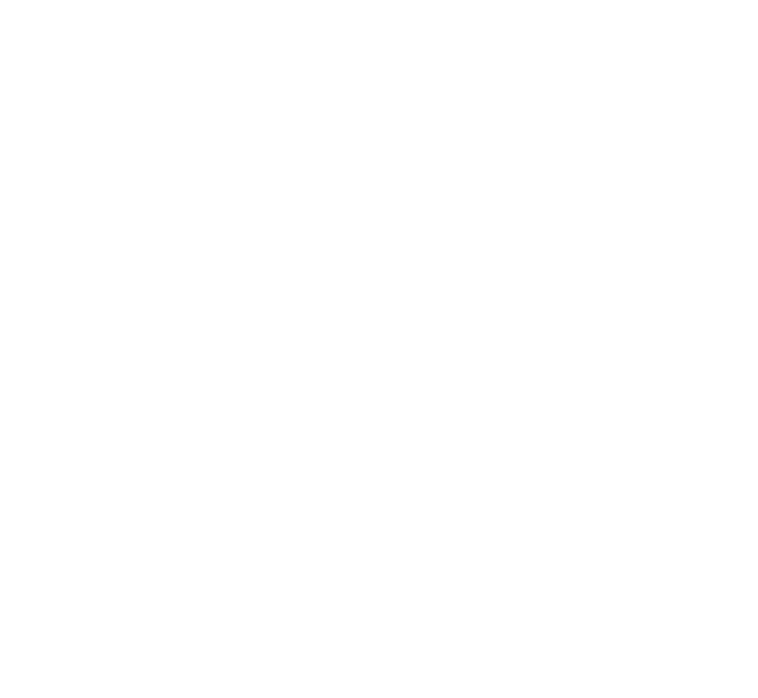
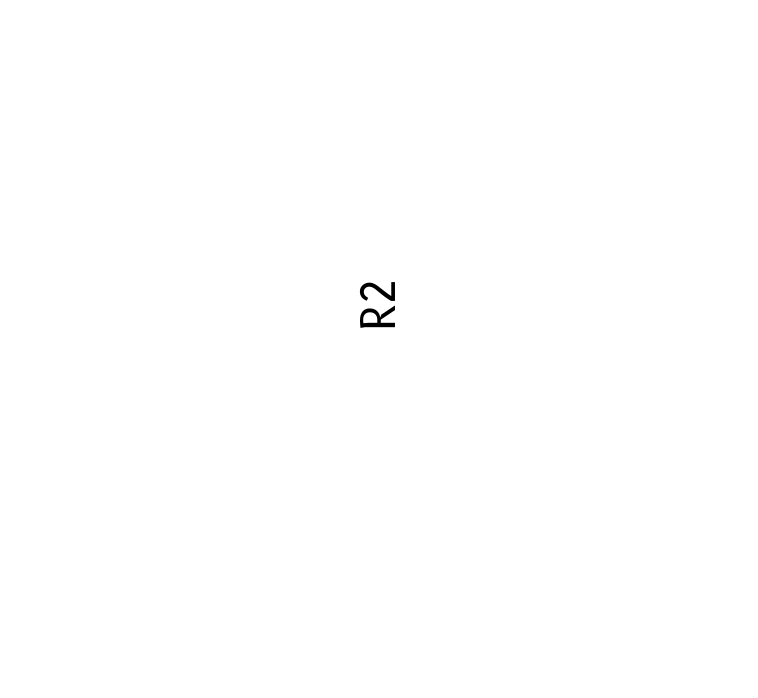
R2: none -> (377, 305)

